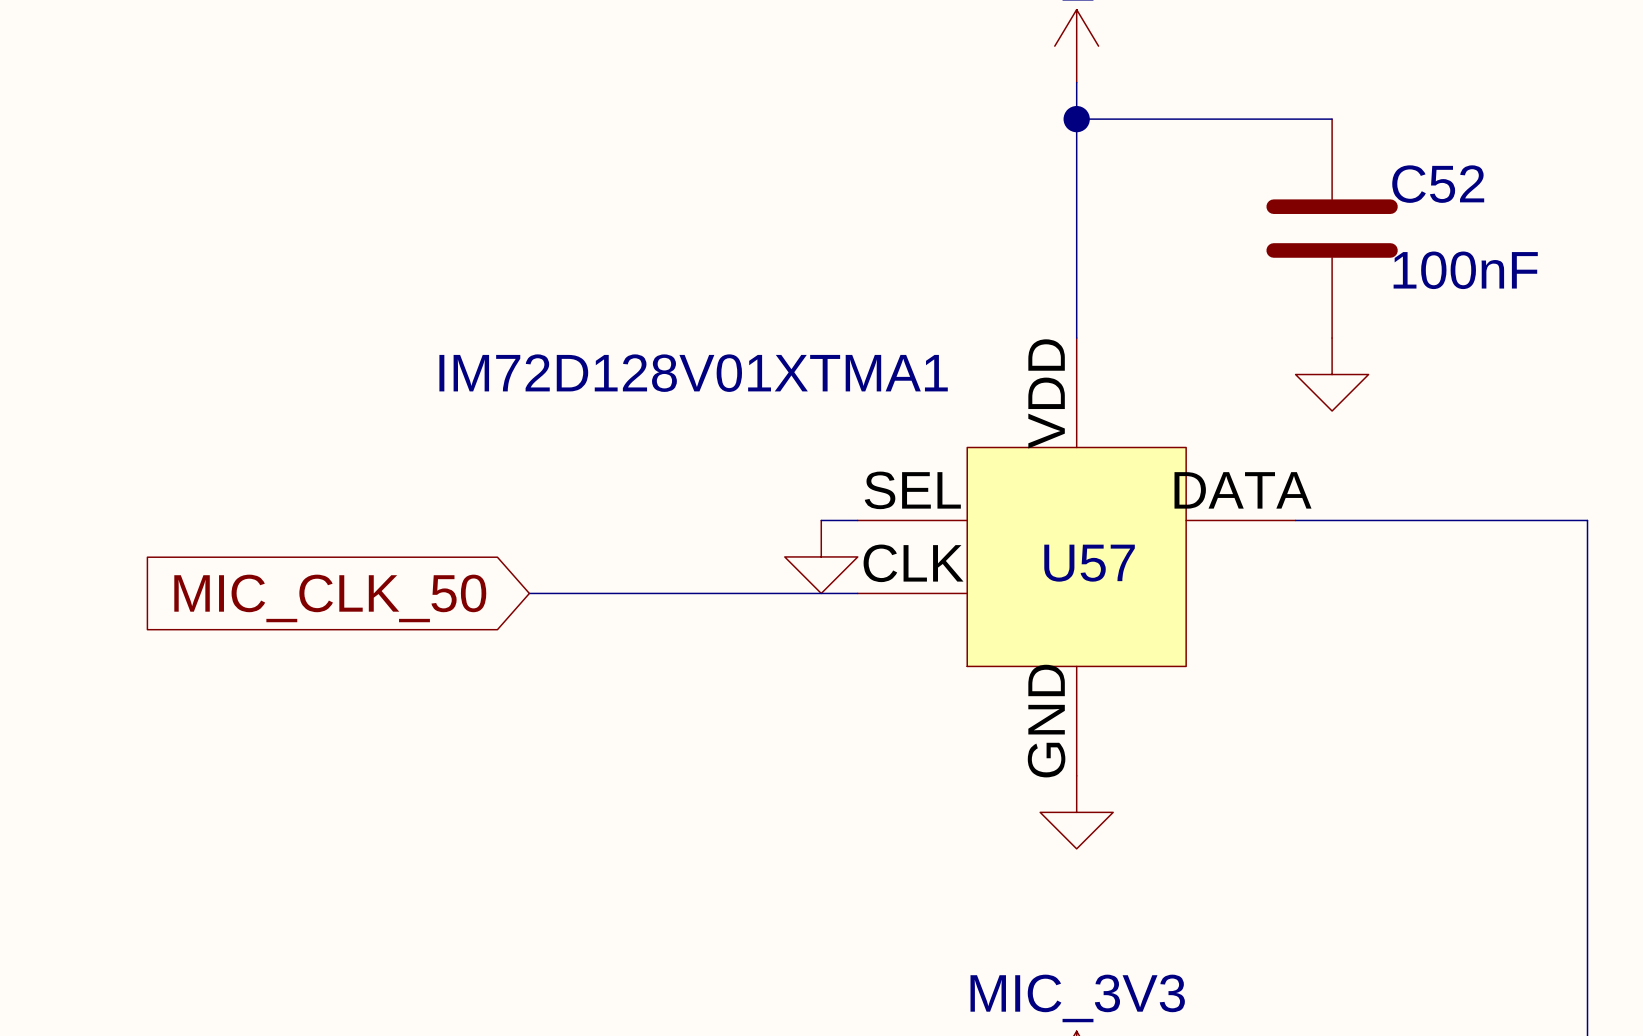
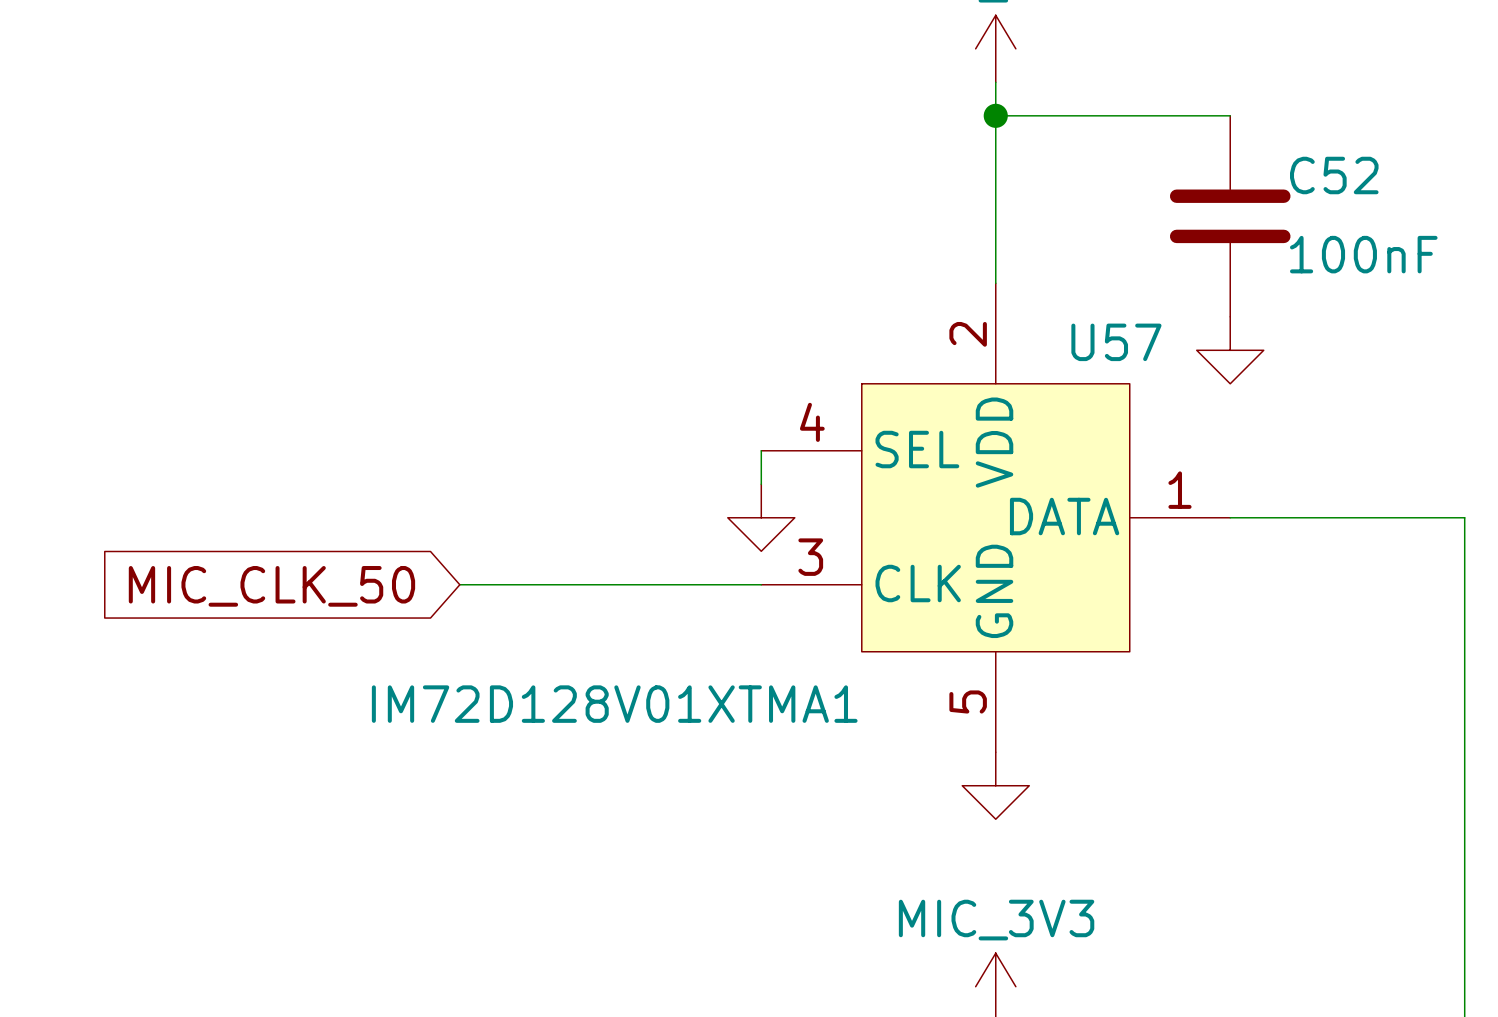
U57 symbol: [857, 338, 1296, 776] -> [761, 283, 1231, 753]
U57 value position: IM72D128V01XTMA1 (693, 373) -> IM72D128V01XTMA1 (614, 704)
wire: (821, 520) (857, 520) -> (761, 484) (761, 450)
wire: (1295, 520) (1587, 520) (1587, 556) -> (1230, 517) (1464, 517)
U57 name position: U57 (1089, 563) -> U57 (1116, 342)
wire: (529, 593) (857, 593) -> (459, 584) (761, 584)
global label position: MIC_CLK_50 (330, 598) -> MIC_CLK_50 (271, 586)
power symbol position: (1076, 812) -> (995, 785)

